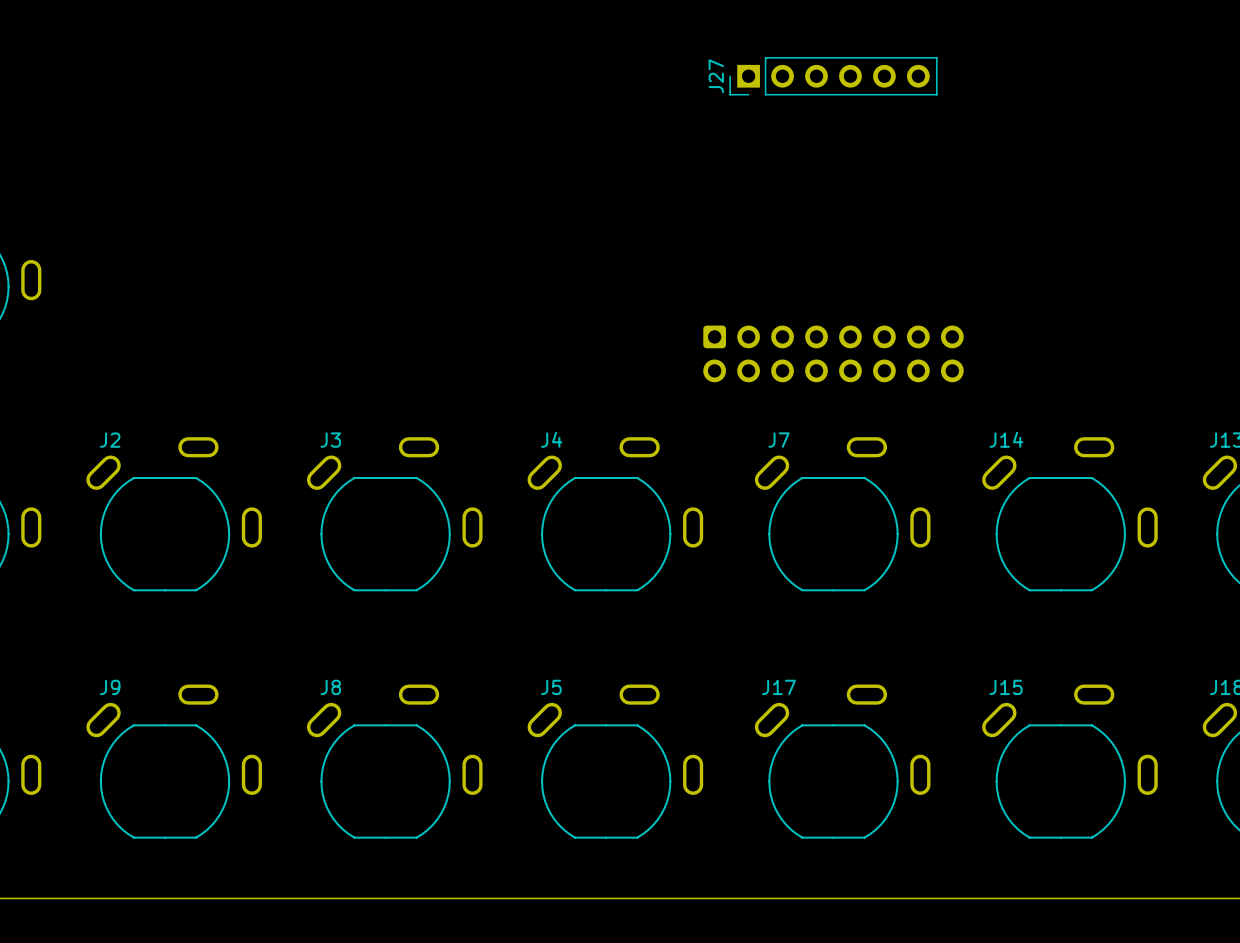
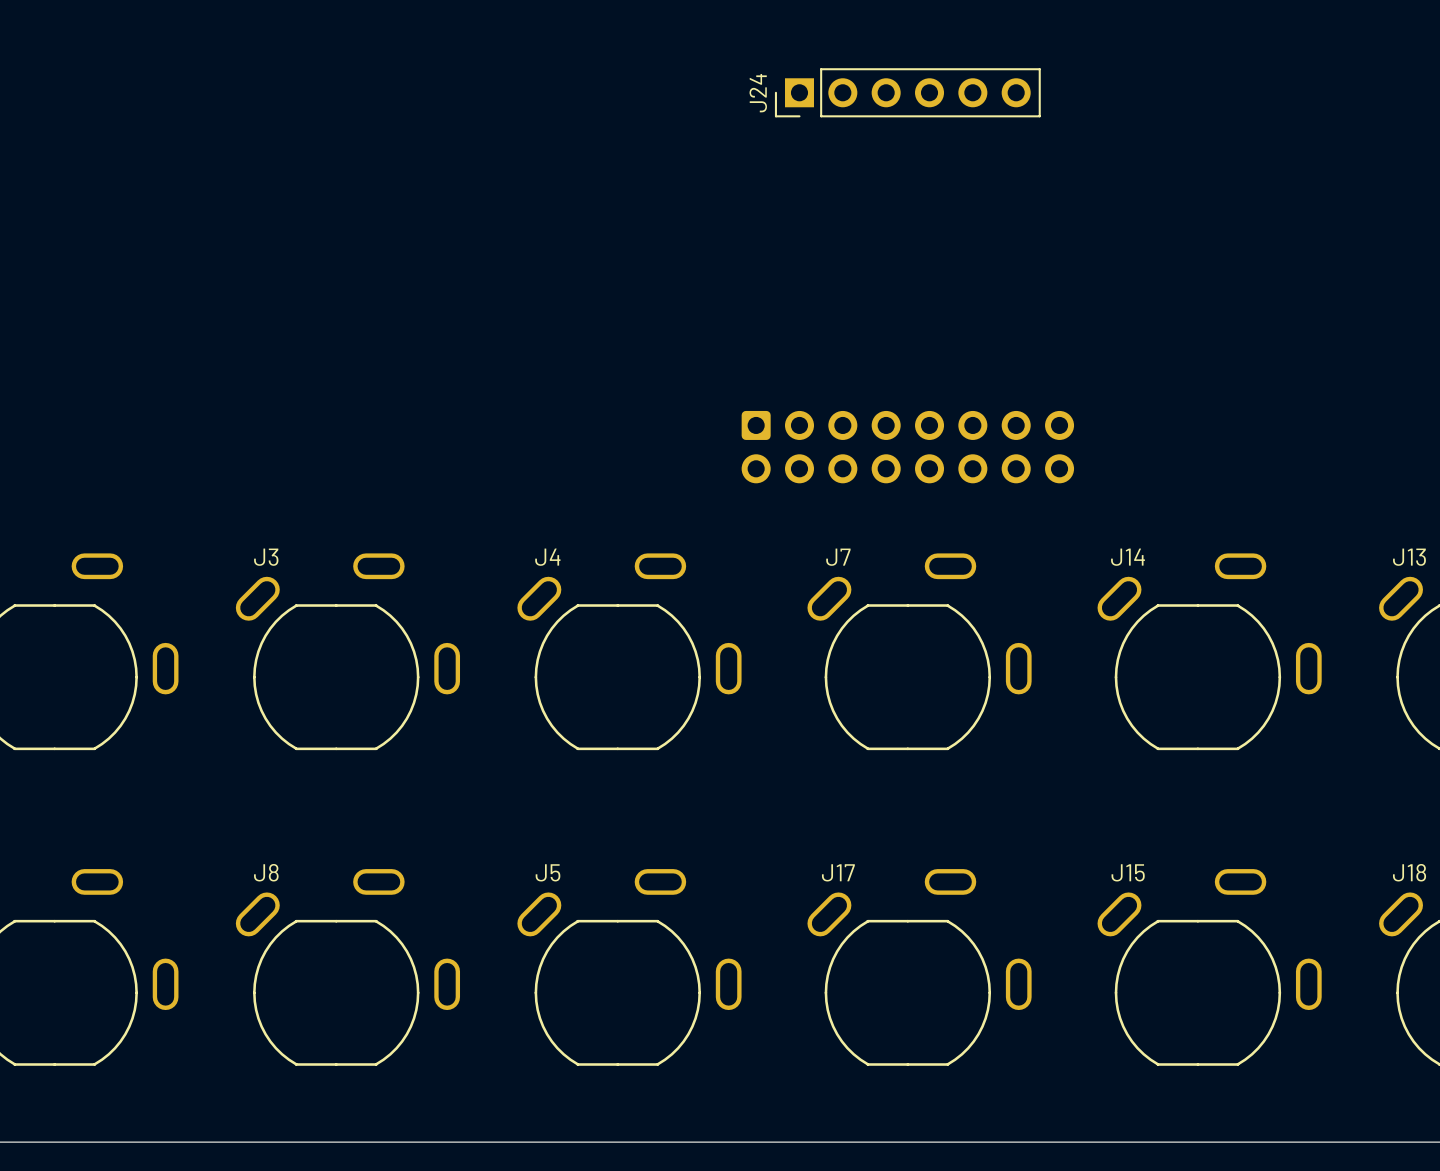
J27 name: J27 (716, 76) -> J24 (758, 93)

